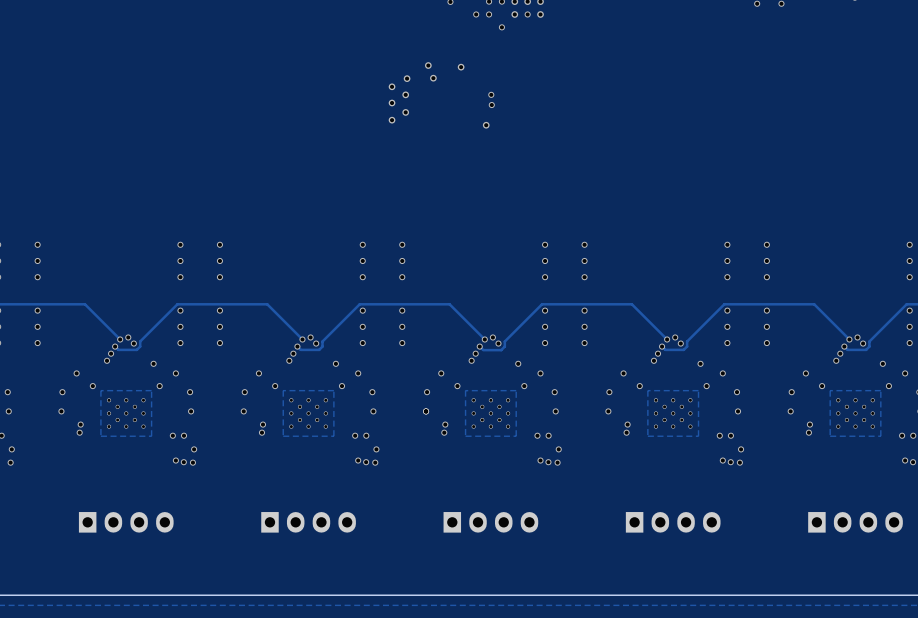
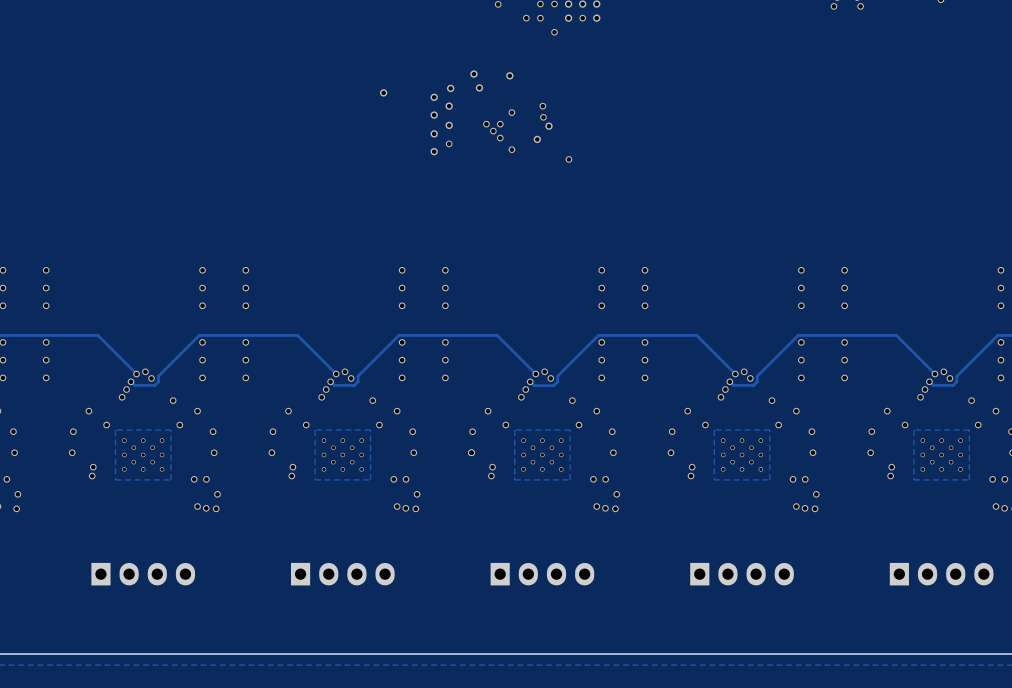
via: none -> (383, 92)
via: none -> (511, 112)
via: none -> (486, 124)
via: none -> (500, 124)
via: none -> (548, 126)
via: none -> (493, 131)
via: none -> (500, 138)
via: none -> (449, 143)
via: none -> (511, 149)
via: none -> (434, 151)
via: none -> (568, 159)

